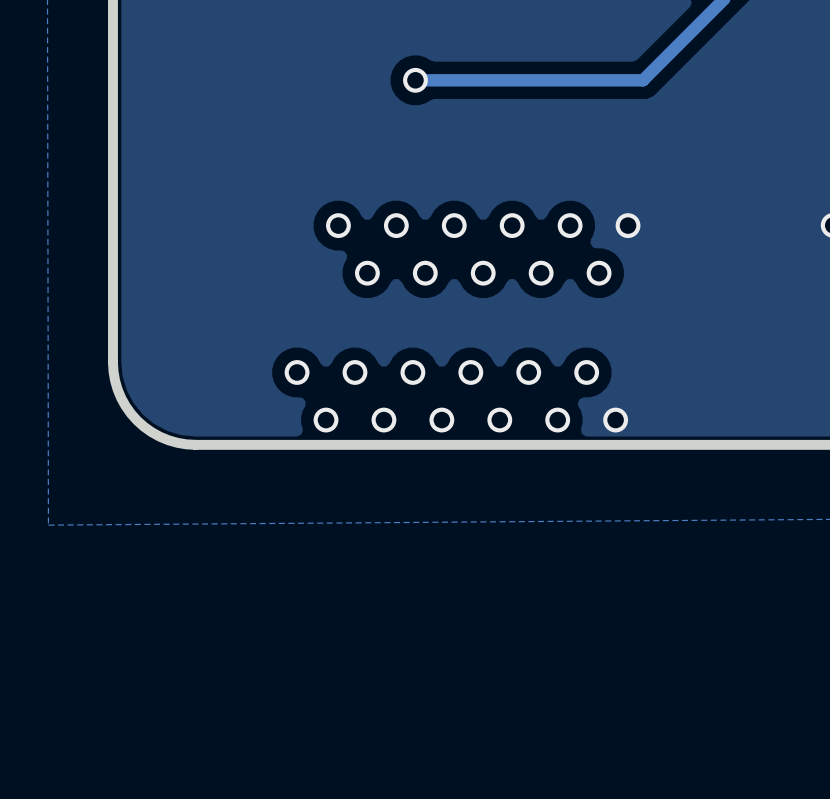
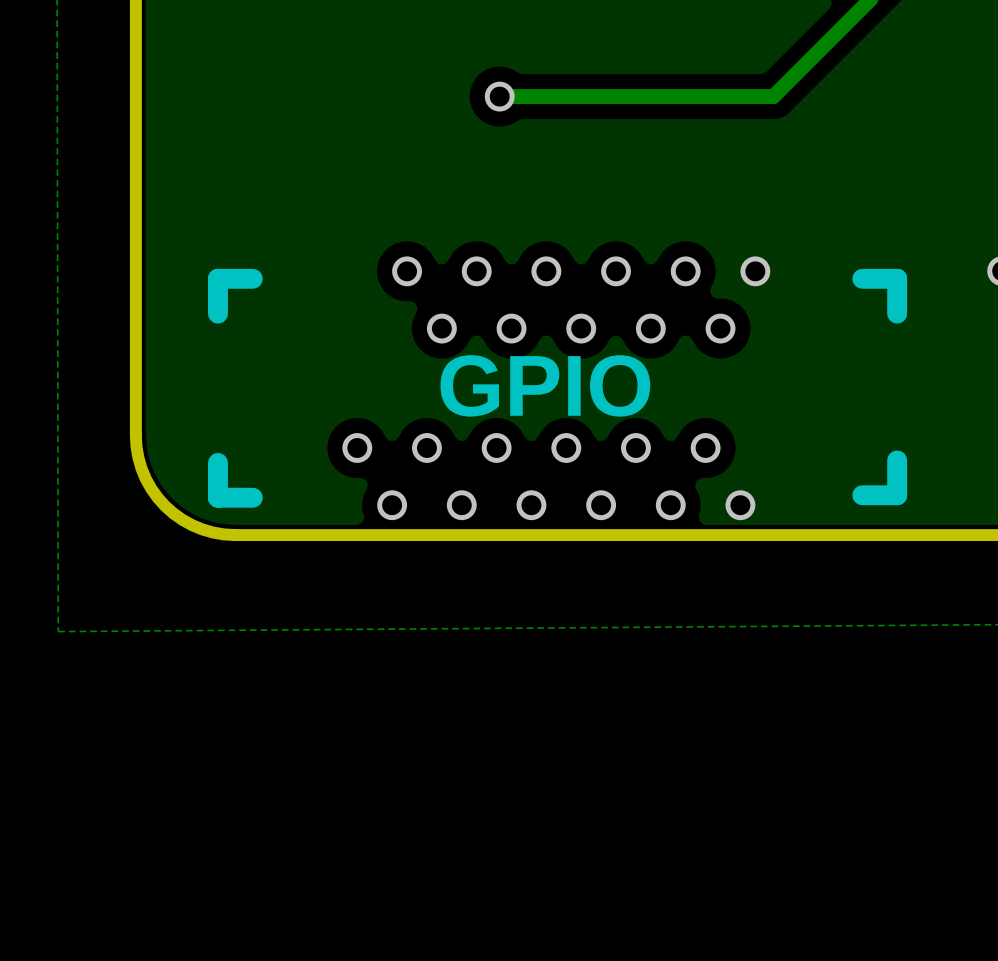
line: none -> (252, 278) (217, 278) (217, 313)
line: none -> (862, 278) (897, 278) (897, 313)
text: none -> GPIO (545, 385)
line: none -> (897, 460) (897, 495) (862, 495)
line: none -> (217, 462) (217, 497) (252, 497)

